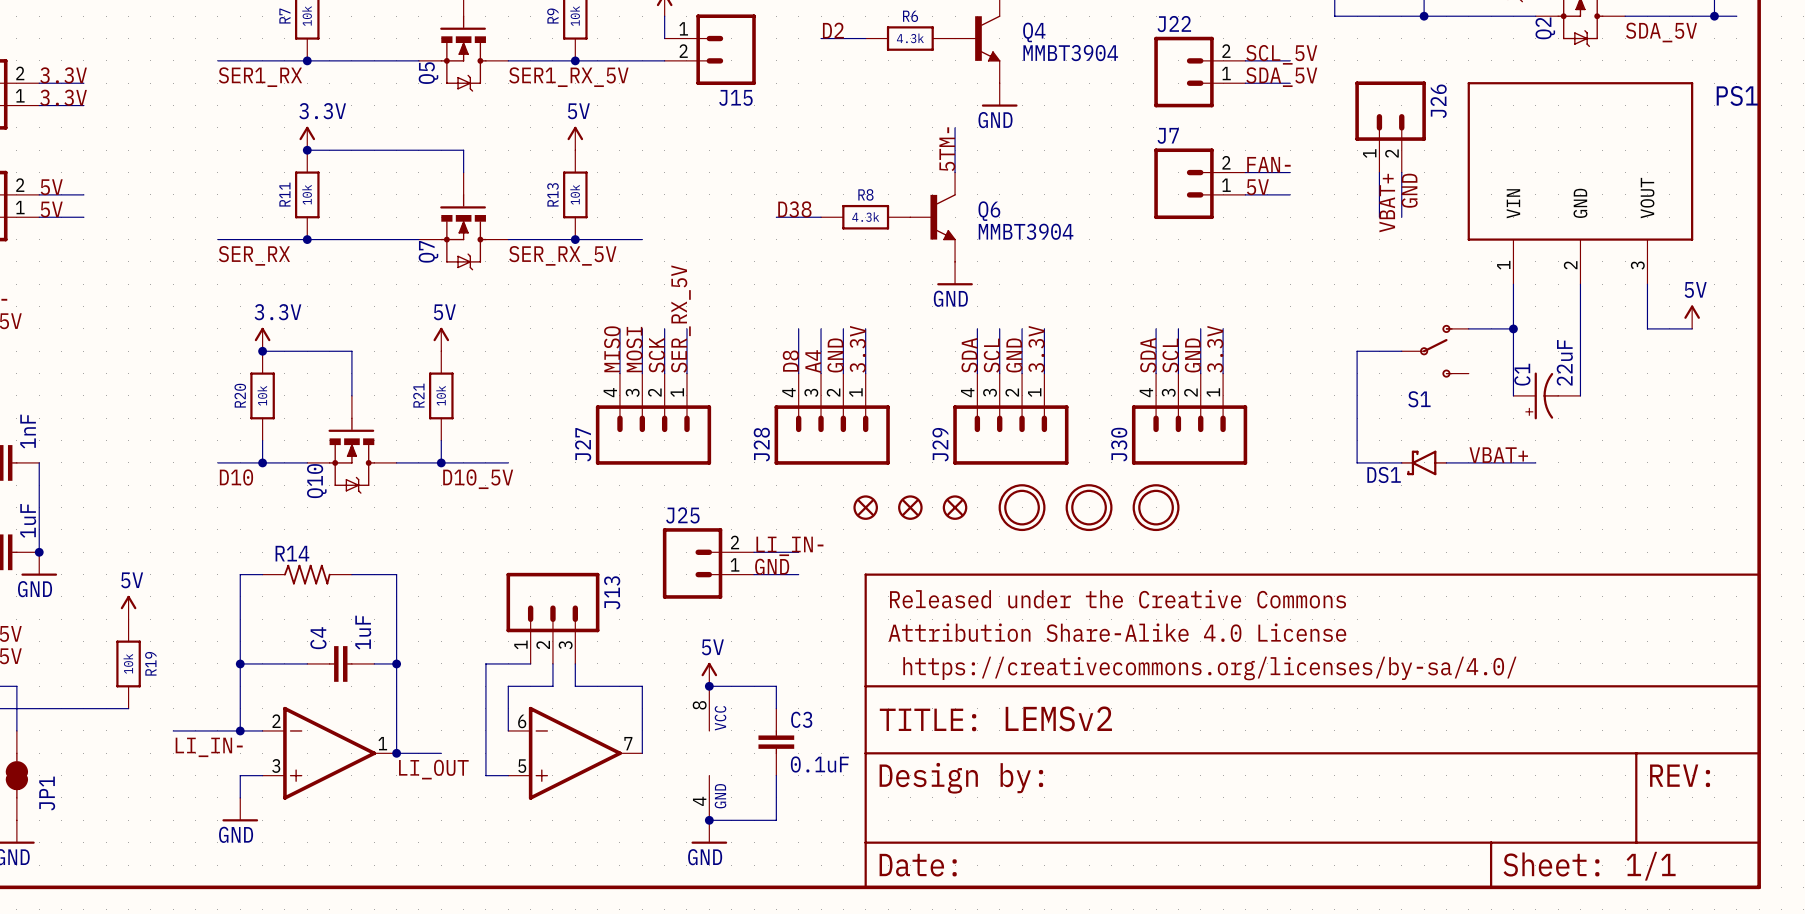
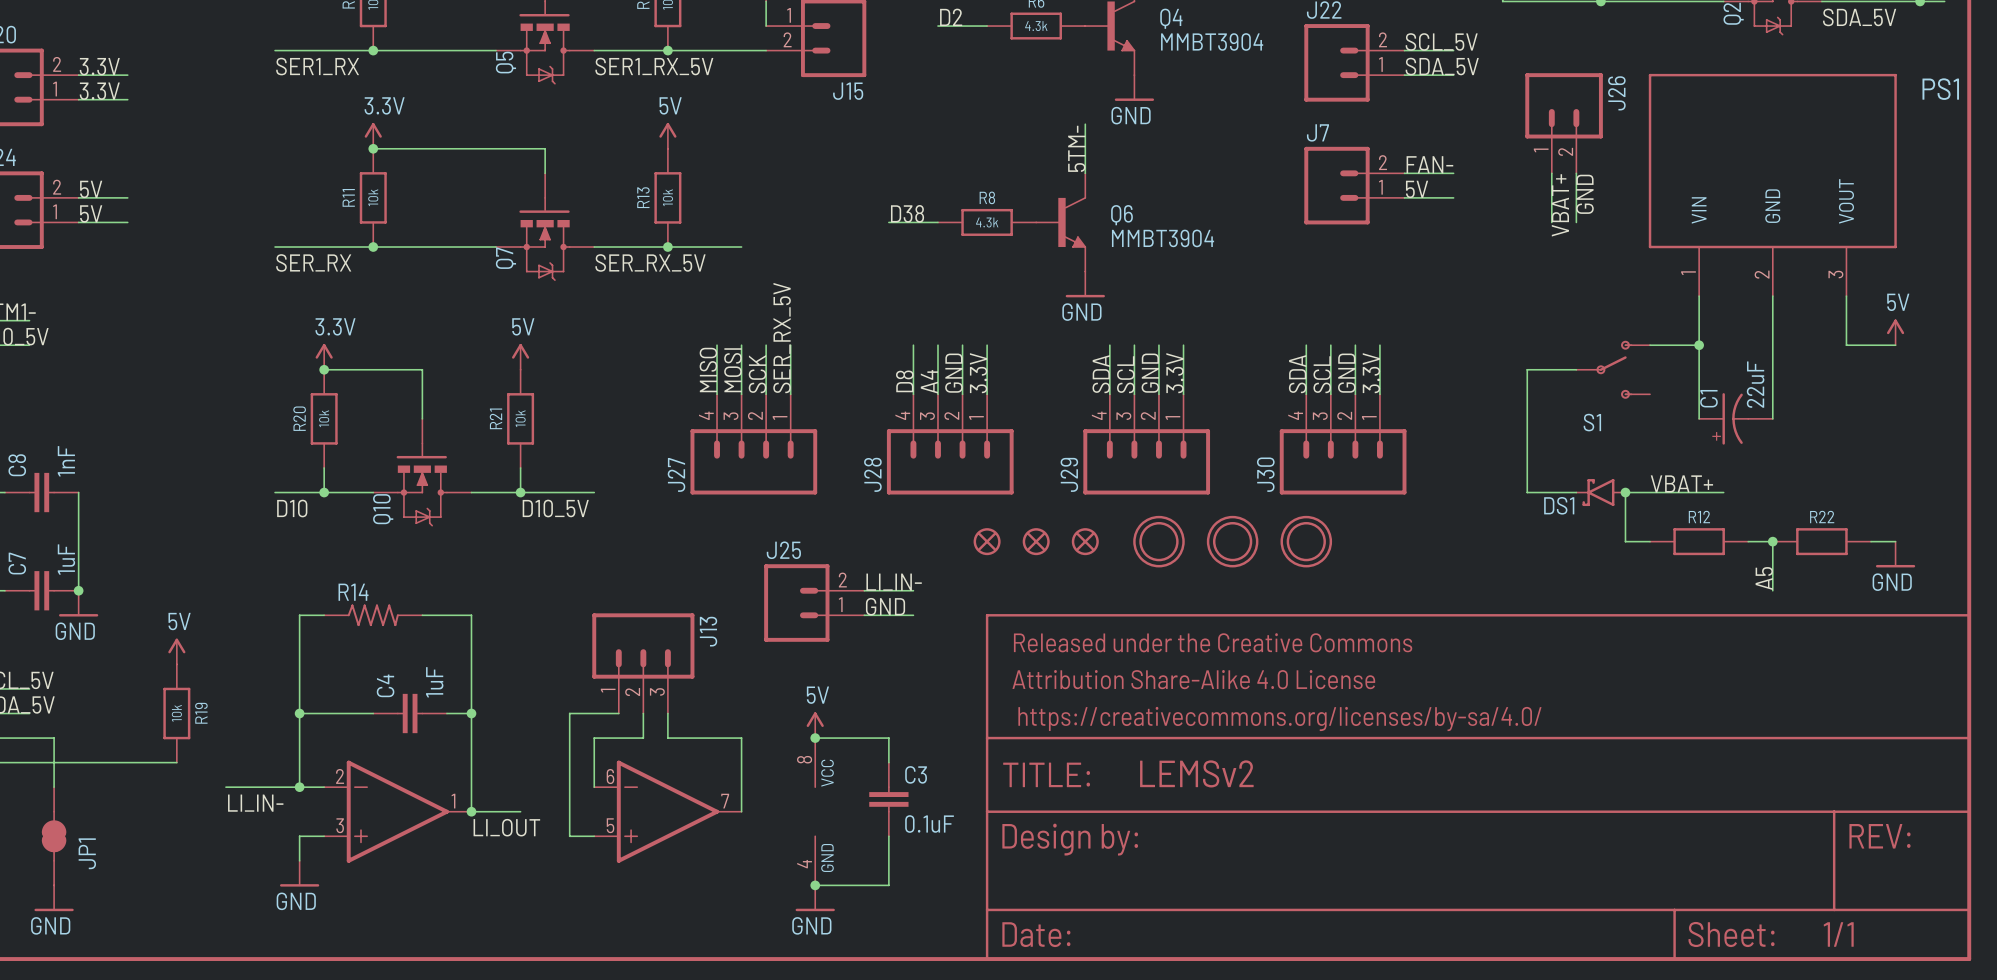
wire: none -> (1625, 492) (1625, 541) (1650, 541)
junction: none -> (1625, 492)
R12: none -> (1699, 541)
wire: none -> (1748, 541) (1772, 541) (1772, 590)
junction: none -> (1772, 541)
R22: none -> (1821, 541)
wire: none -> (1871, 541) (1895, 541)
power symbol: none -> GND (1895, 554)
label: none -> A5 (1764, 578)

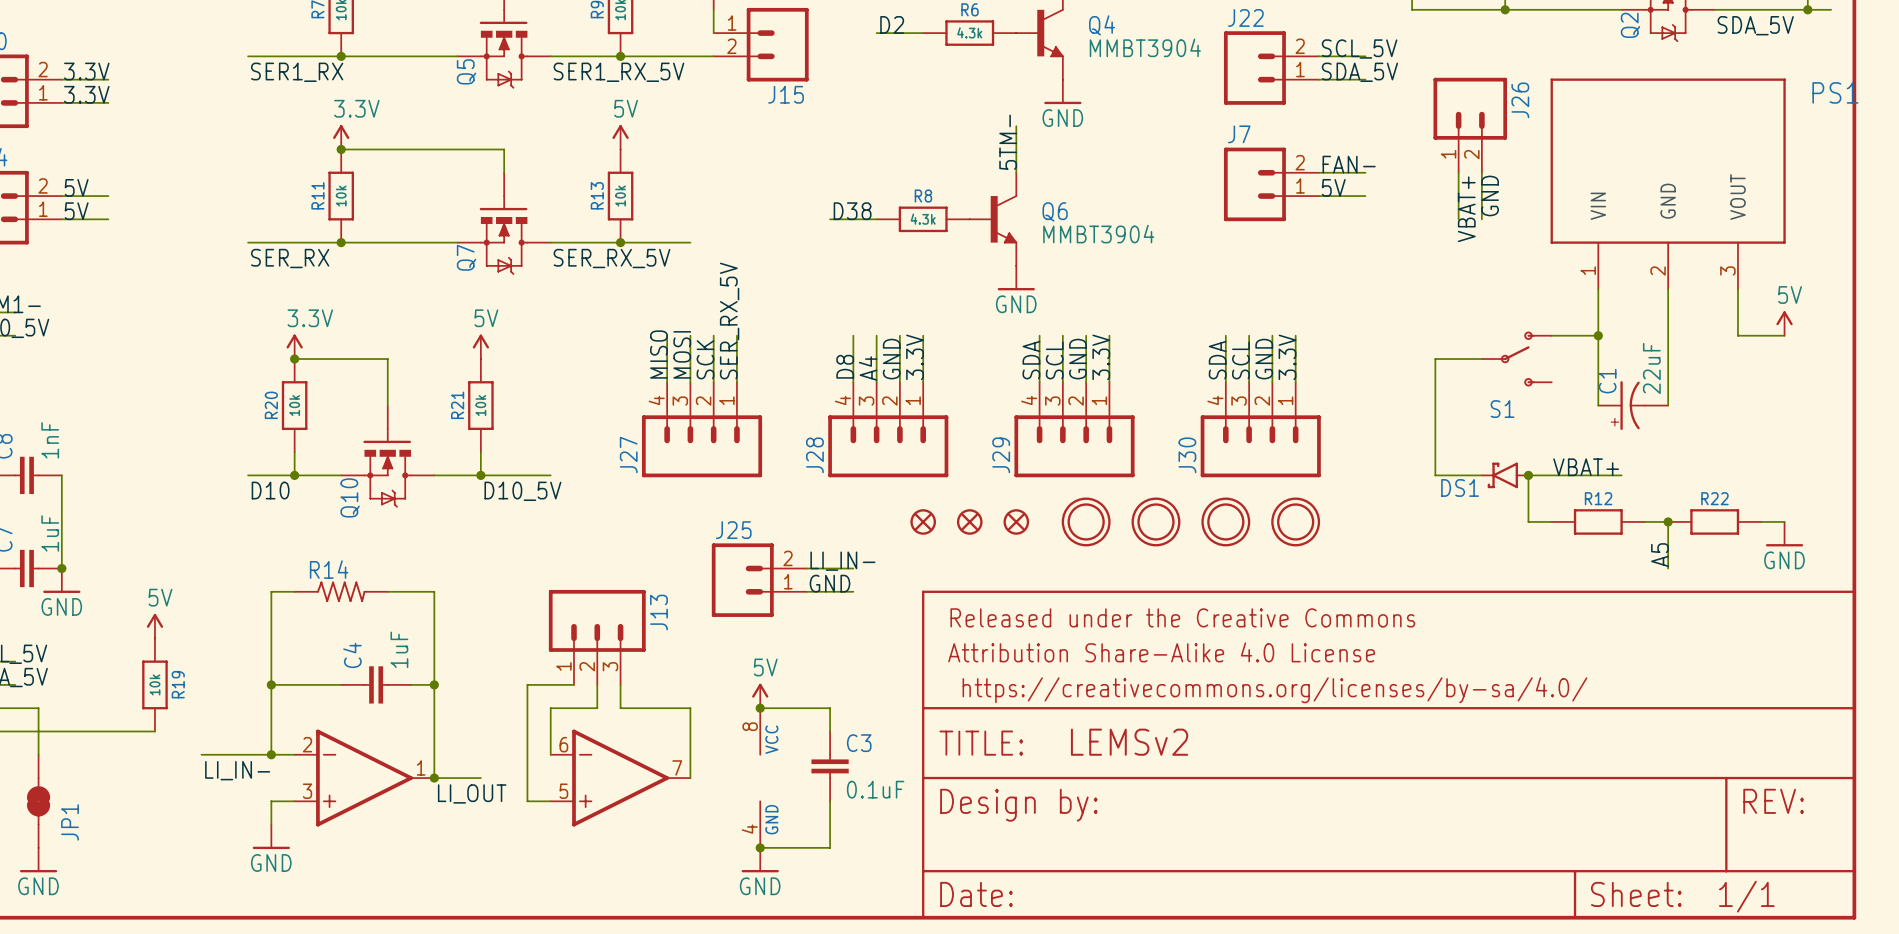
part: none -> (1295, 521)

